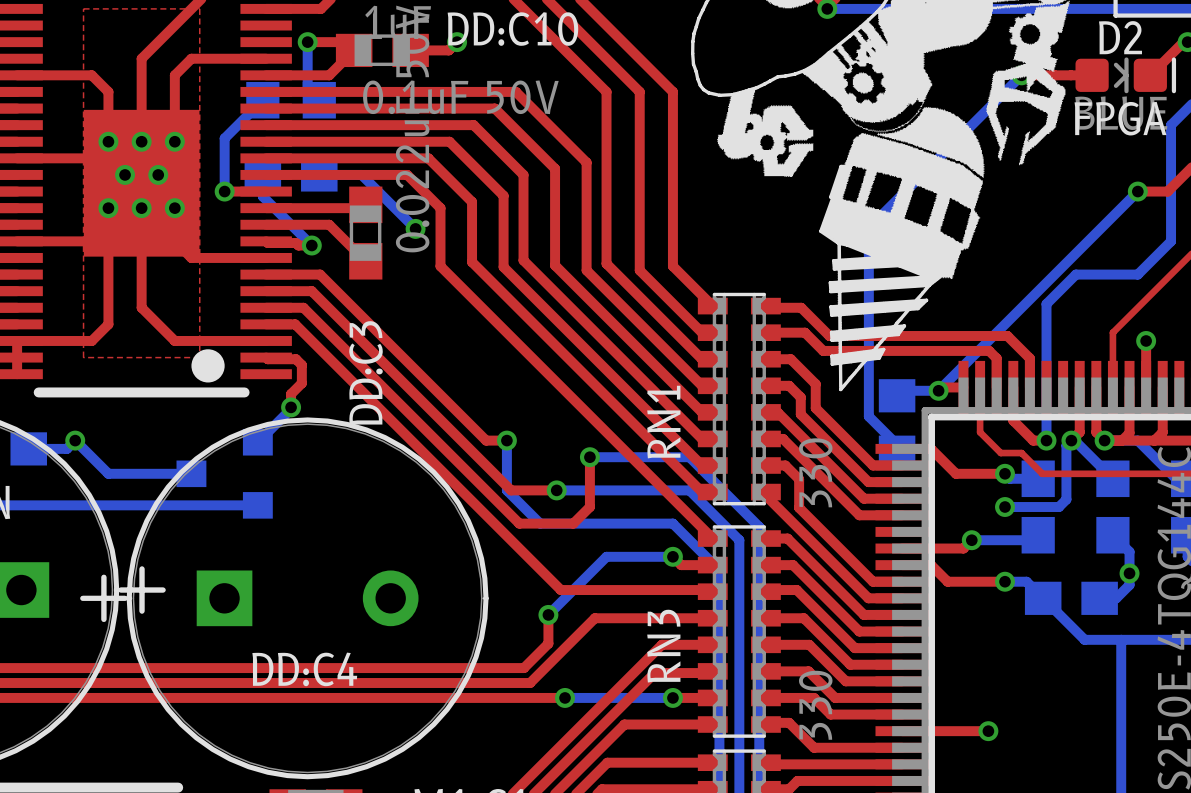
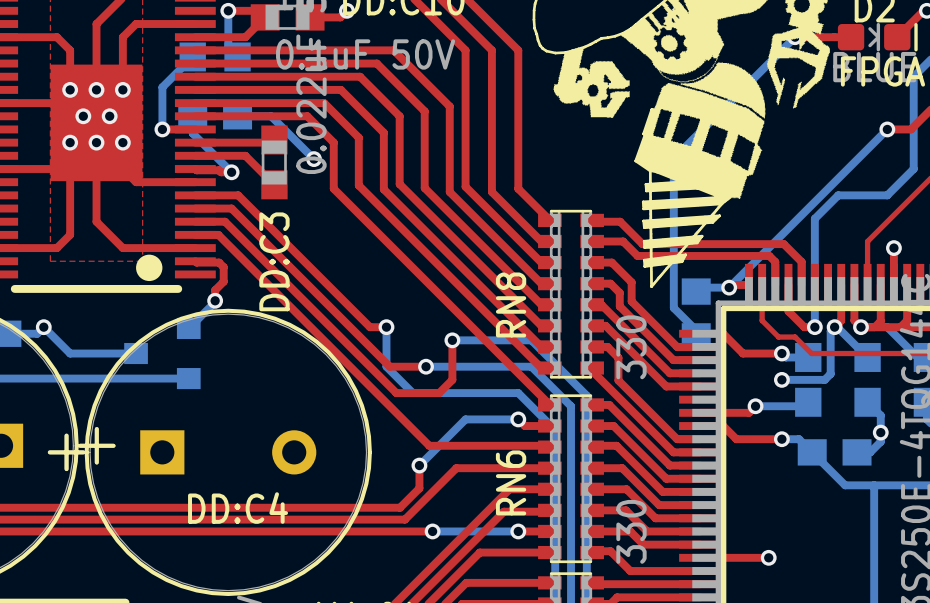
RN1 name: RN1 (663, 422) -> RN8 (511, 304)
RN3 name: RN3 (663, 646) -> RN6 (511, 482)

